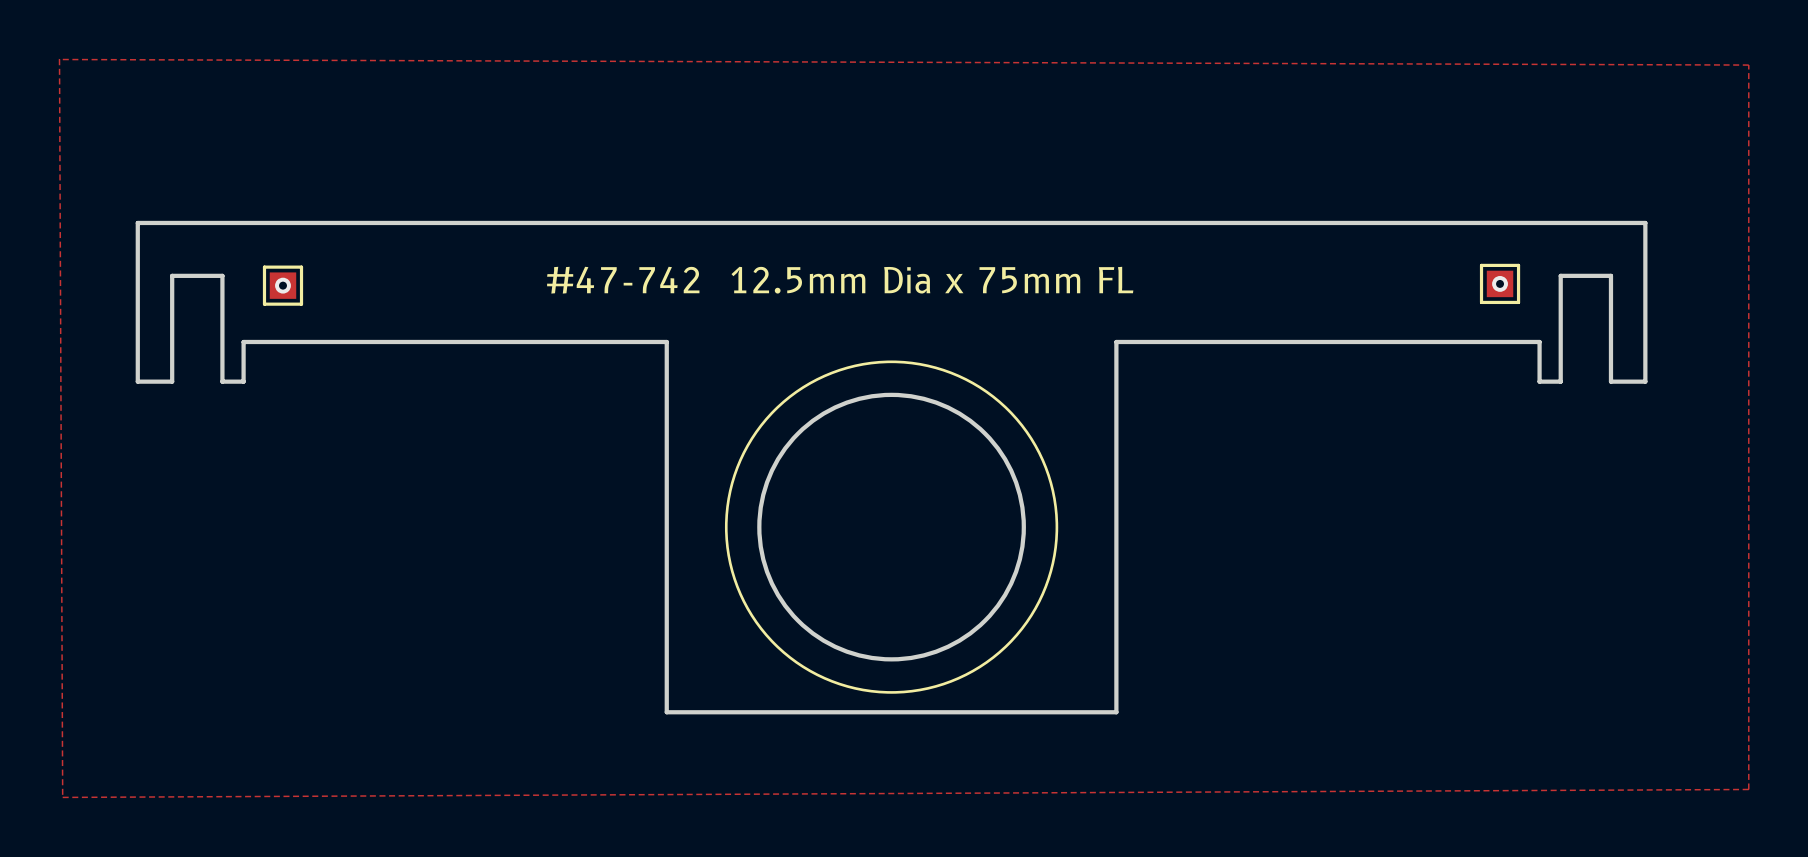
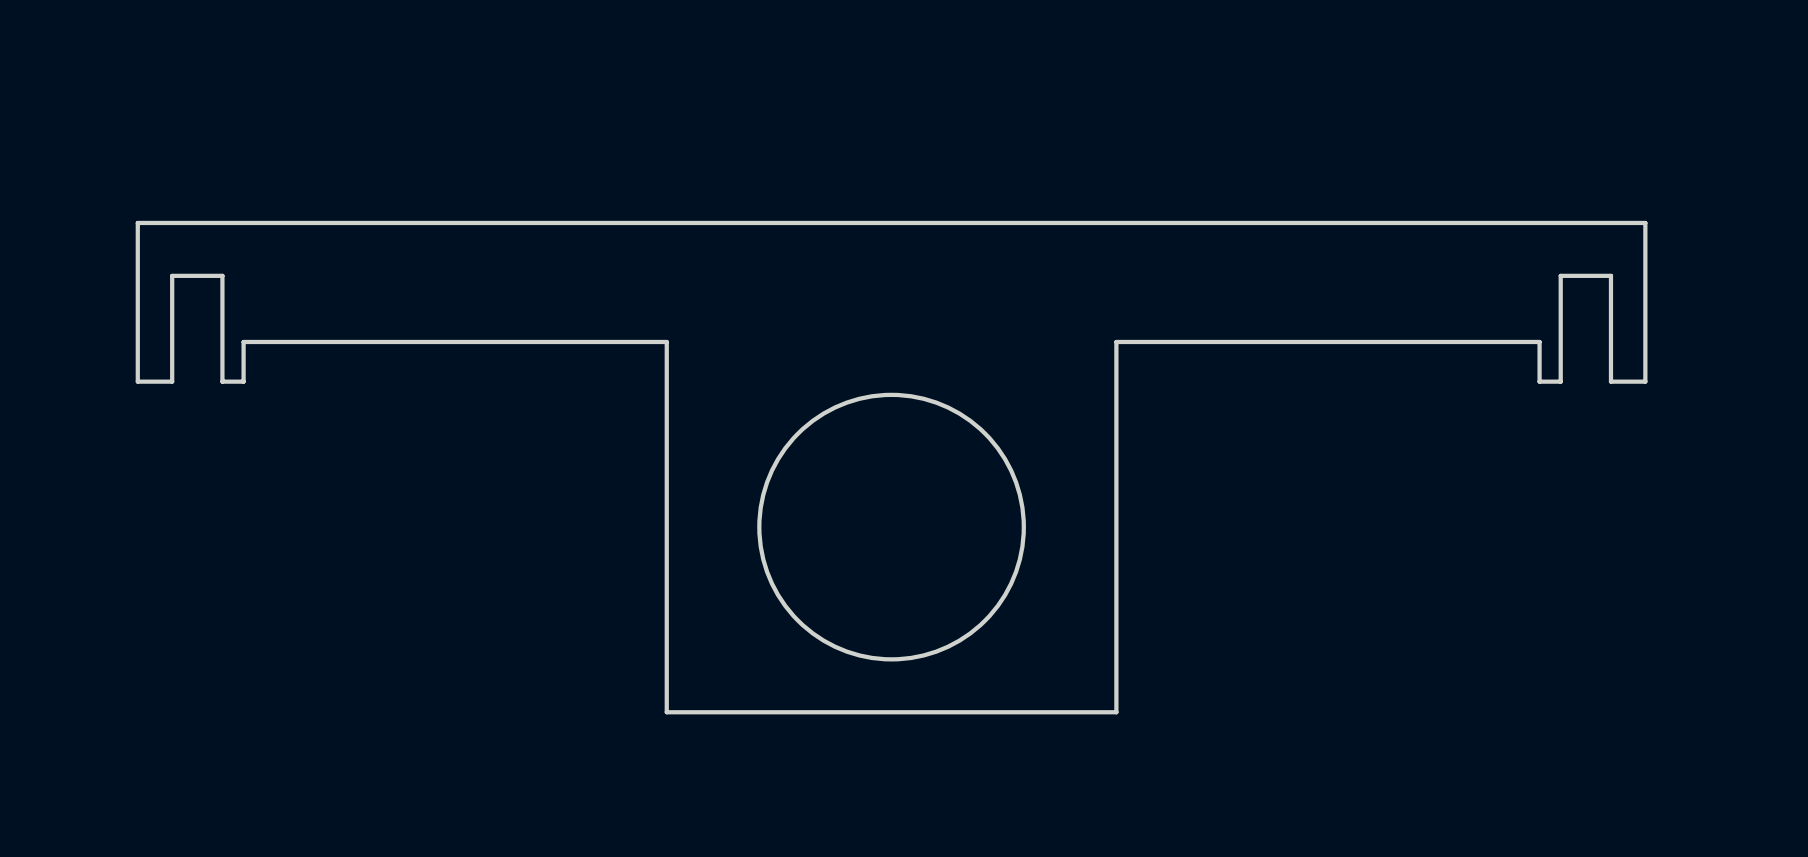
zone outline: (59, 59) (62, 797) (1748, 789) (1748, 65) (59, 59) -> none
text: #47-742 12.5mm Dia x 75mm FL (840, 280) -> none
part: (1500, 283) -> none
via: (1500, 283) -> none
part: (283, 285) -> none
via: (283, 285) -> none
drawing: [724, 360, 1059, 694] -> none

